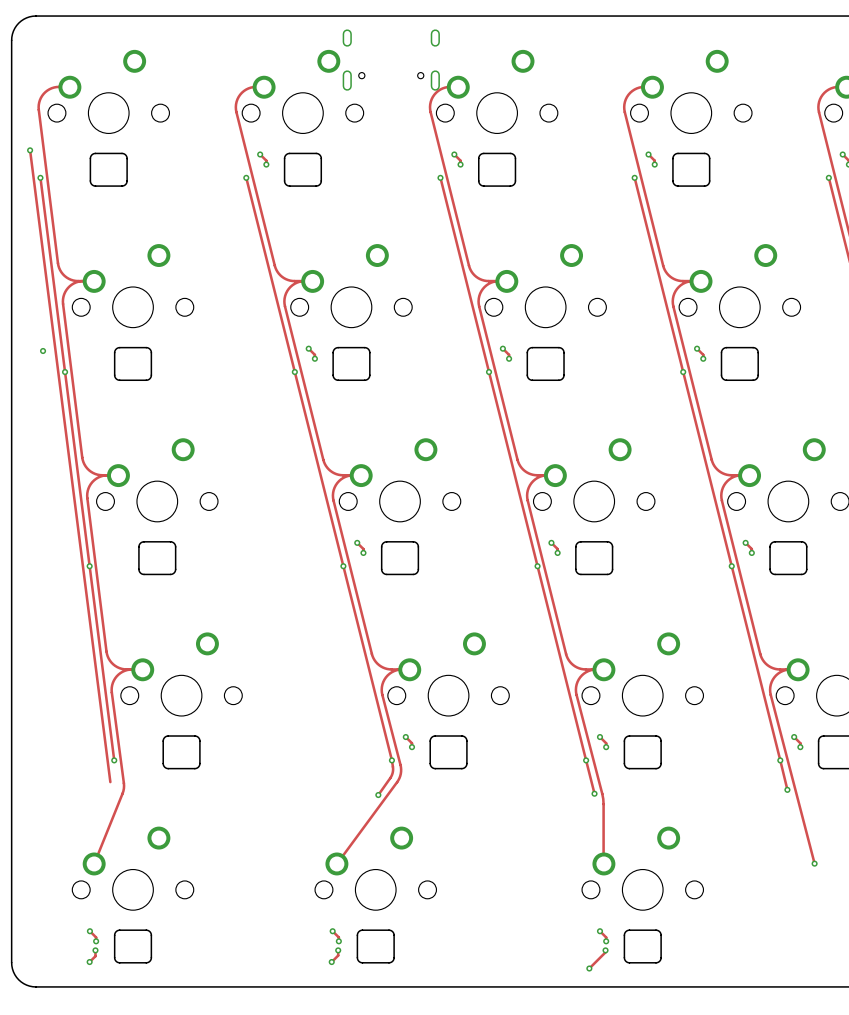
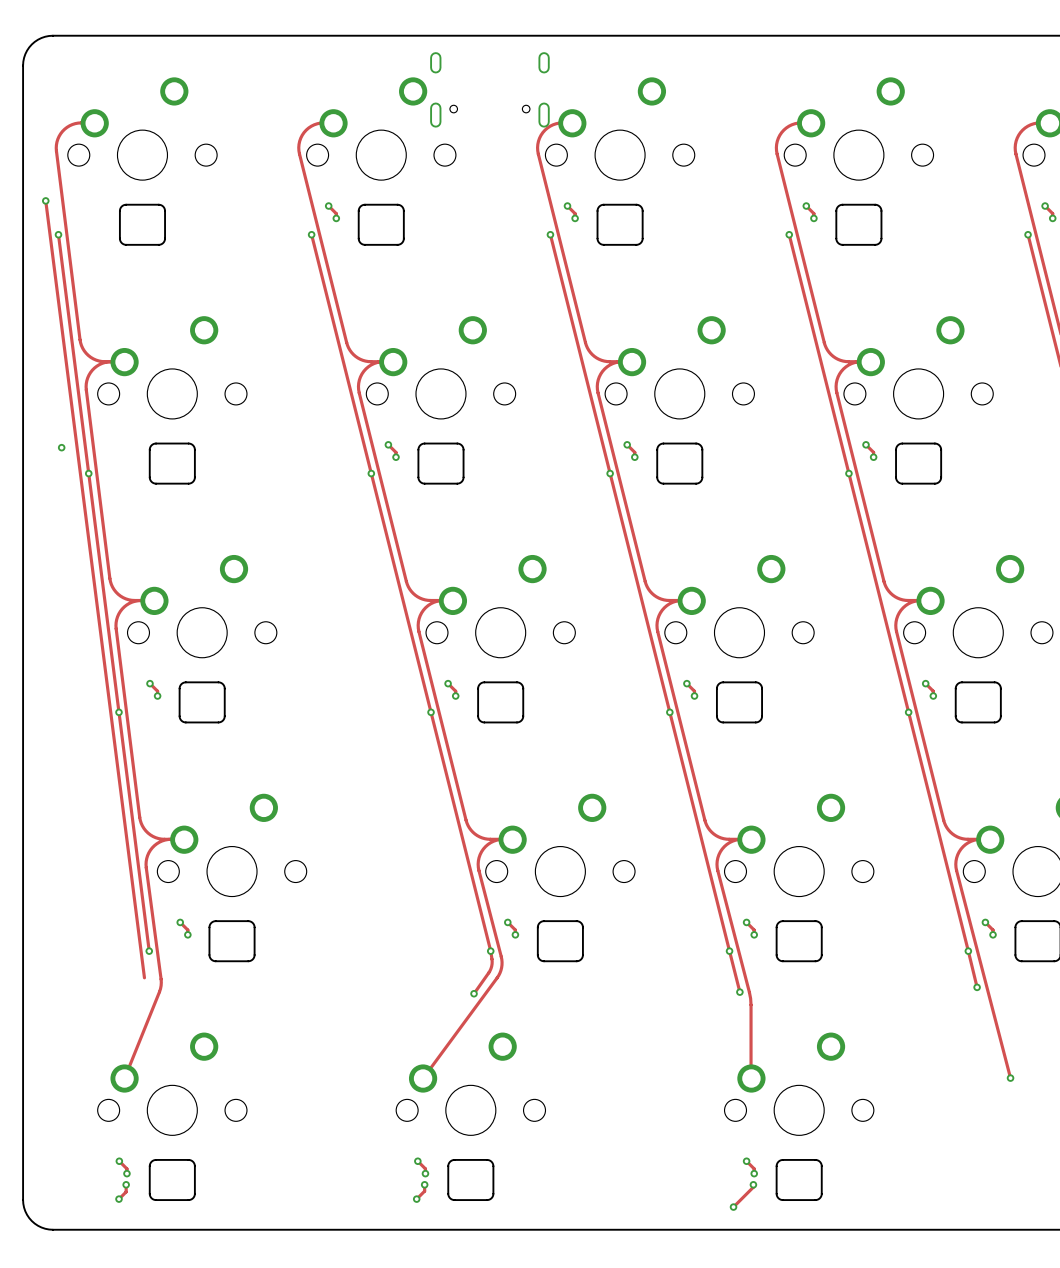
track: none -> (149, 683) (157, 691) (157, 696)
via: none -> (149, 683)
via: none -> (157, 696)
track: none -> (180, 922) (187, 930) (187, 934)
via: none -> (180, 922)
via: none -> (187, 934)

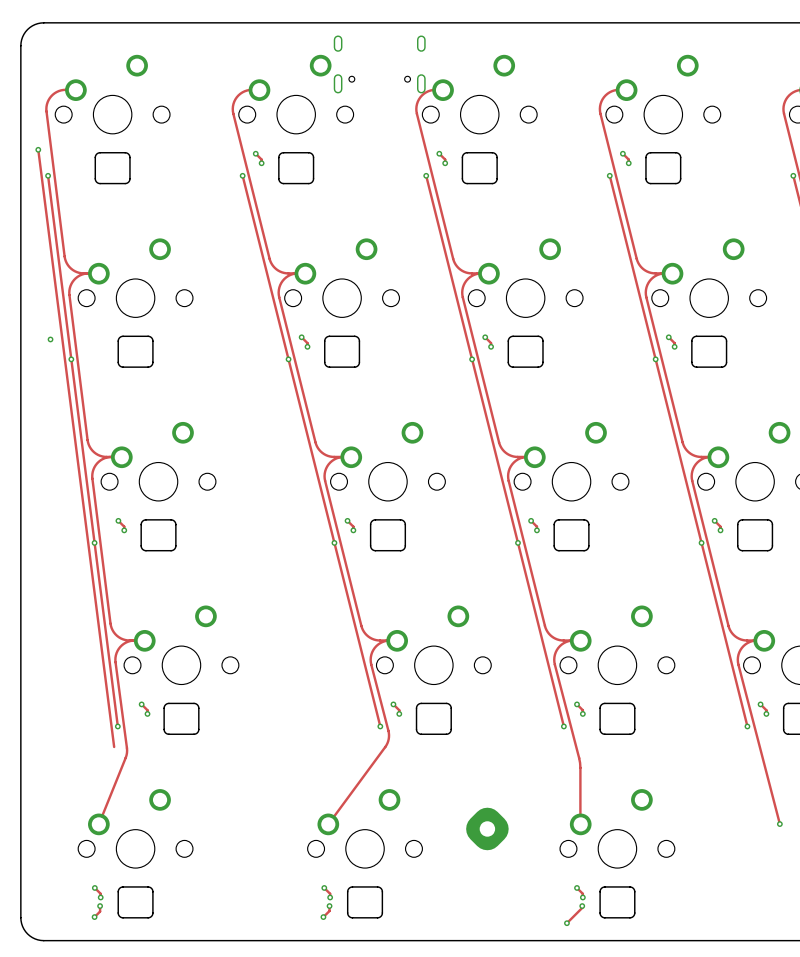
track: (490, 951) (490, 968) (474, 993) -> none
track: (729, 951) (739, 992) -> none
track: (968, 951) (977, 987) -> none
via: (977, 987) -> none
via: (739, 992) -> none
via: (474, 993) -> none
part: none -> (487, 828)

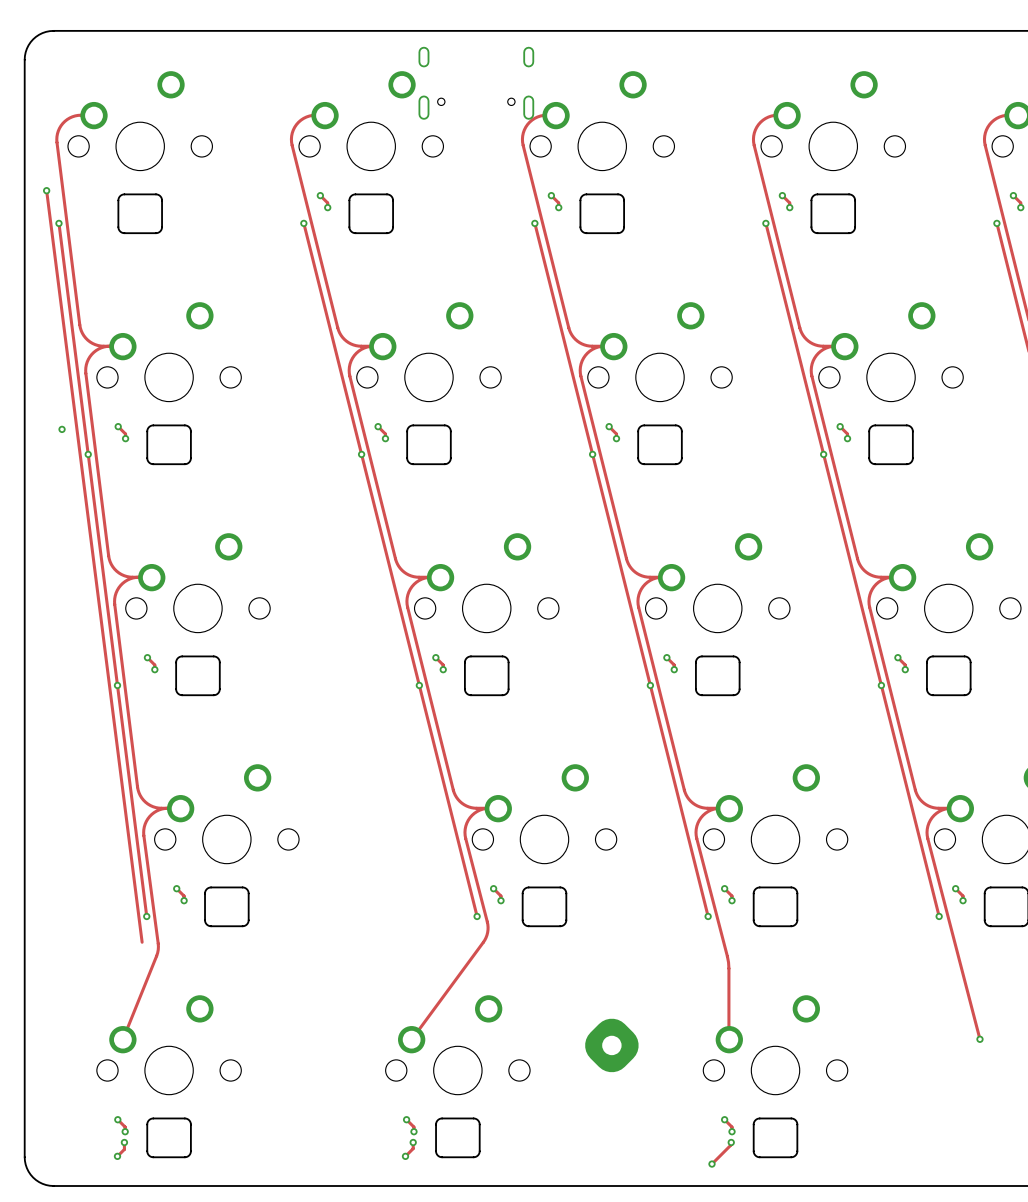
track: none -> (118, 426) (125, 434) (125, 438)
via: none -> (118, 426)
via: none -> (125, 438)

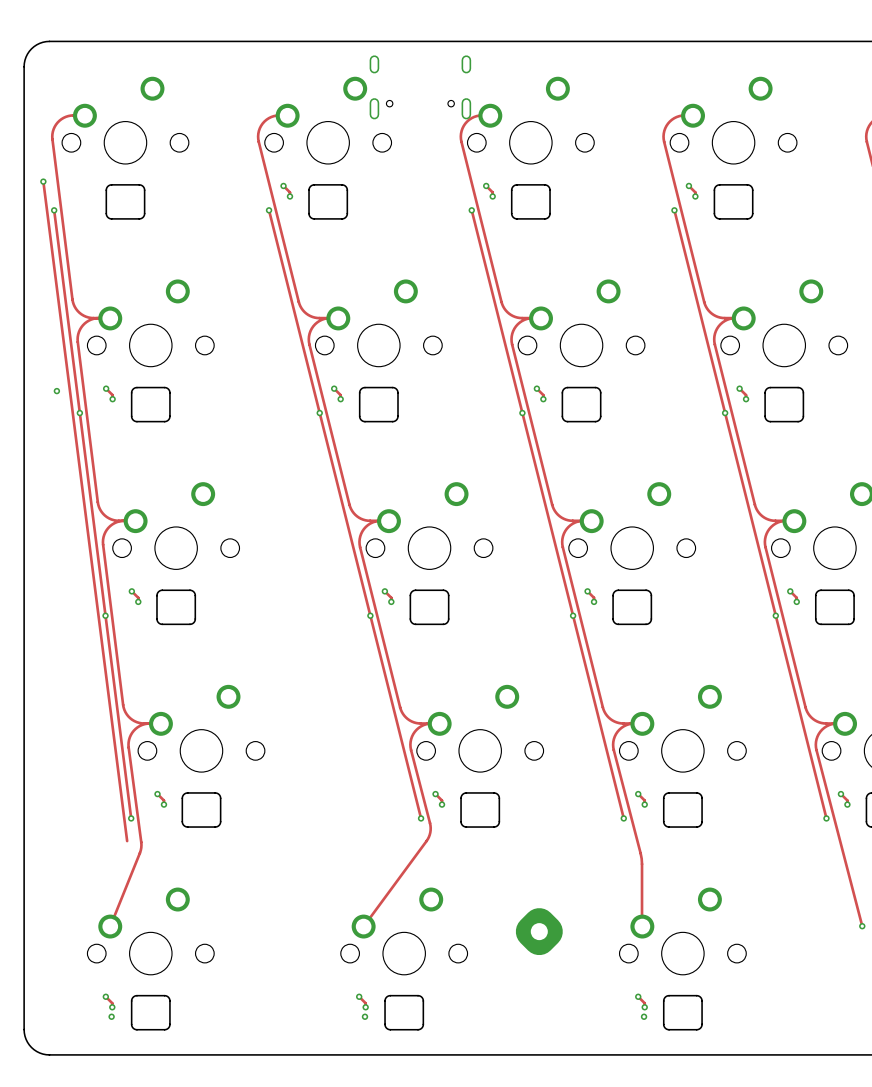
track: (124, 1142) (124, 1149) (117, 1156) -> none
track: (413, 1142) (413, 1148) (405, 1156) -> none
track: (731, 1142) (731, 1144) (711, 1164) -> none
via: (117, 1156) -> none
via: (405, 1156) -> none
via: (711, 1164) -> none

